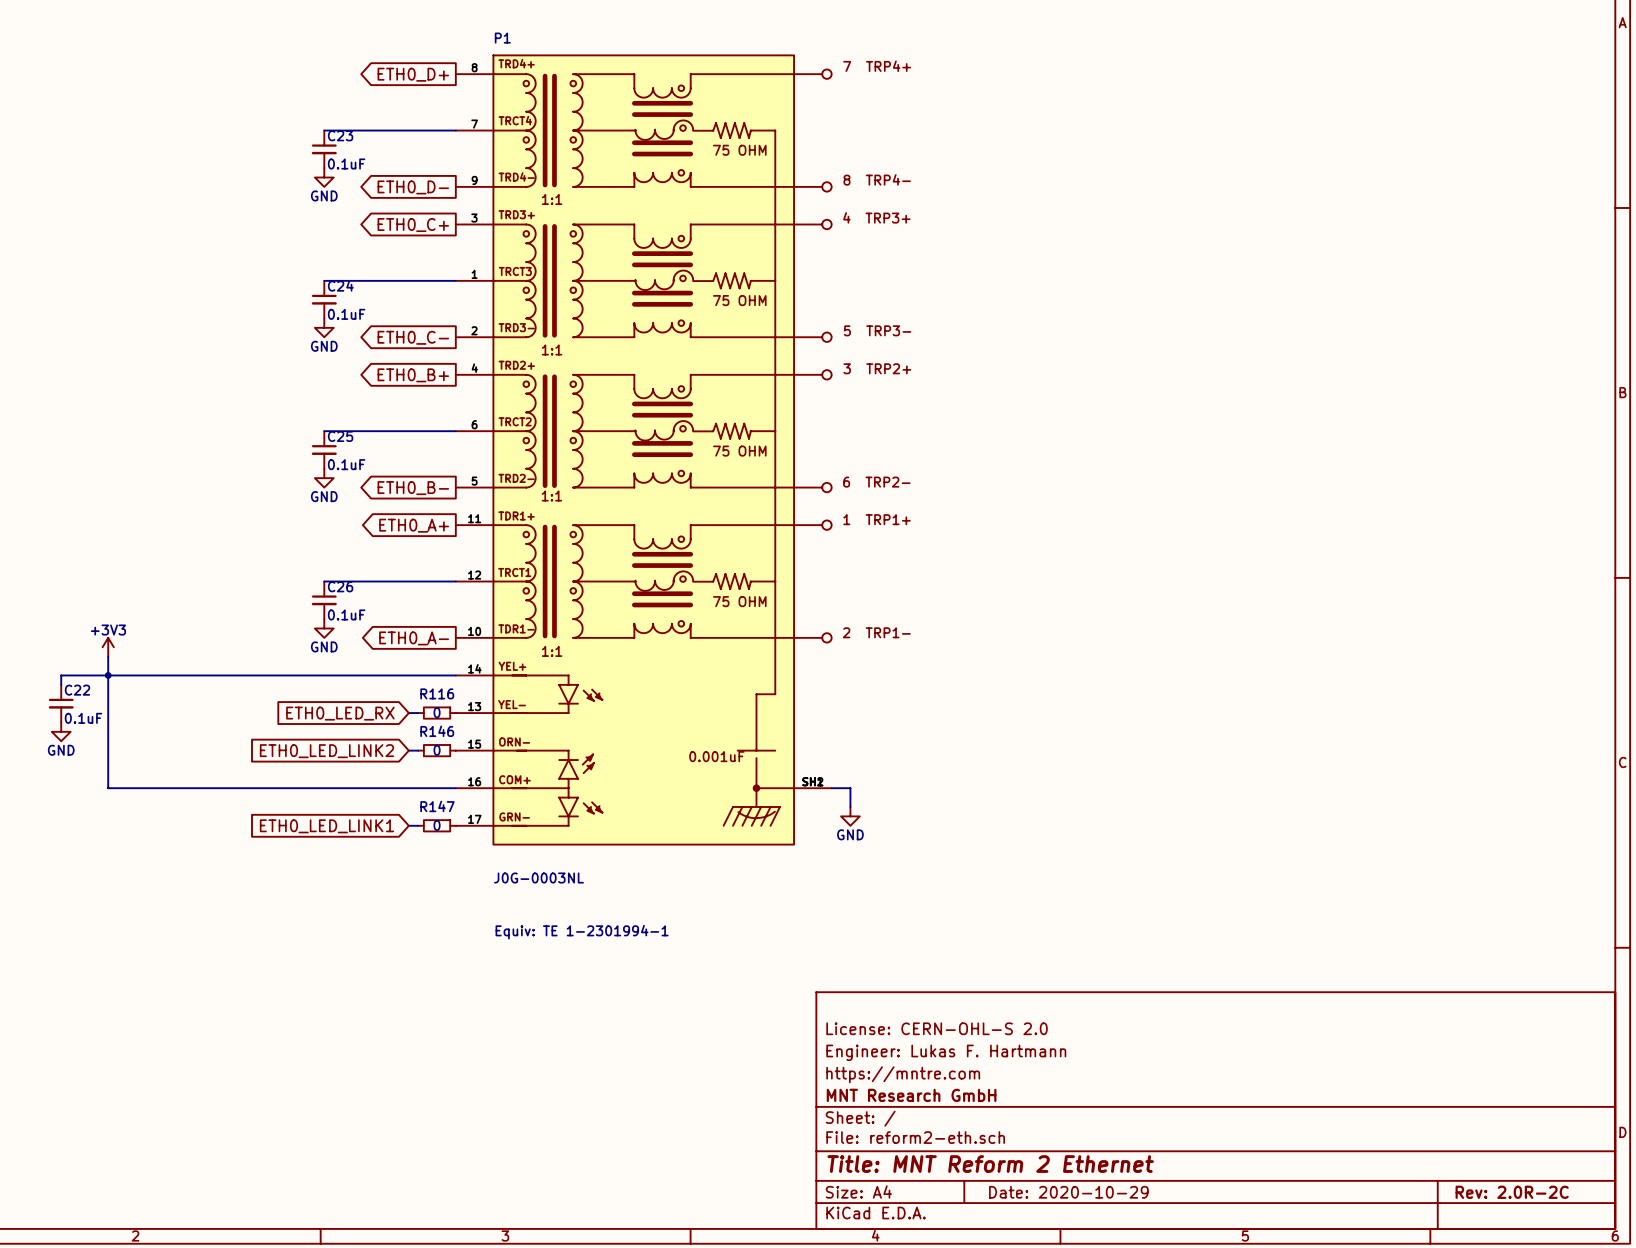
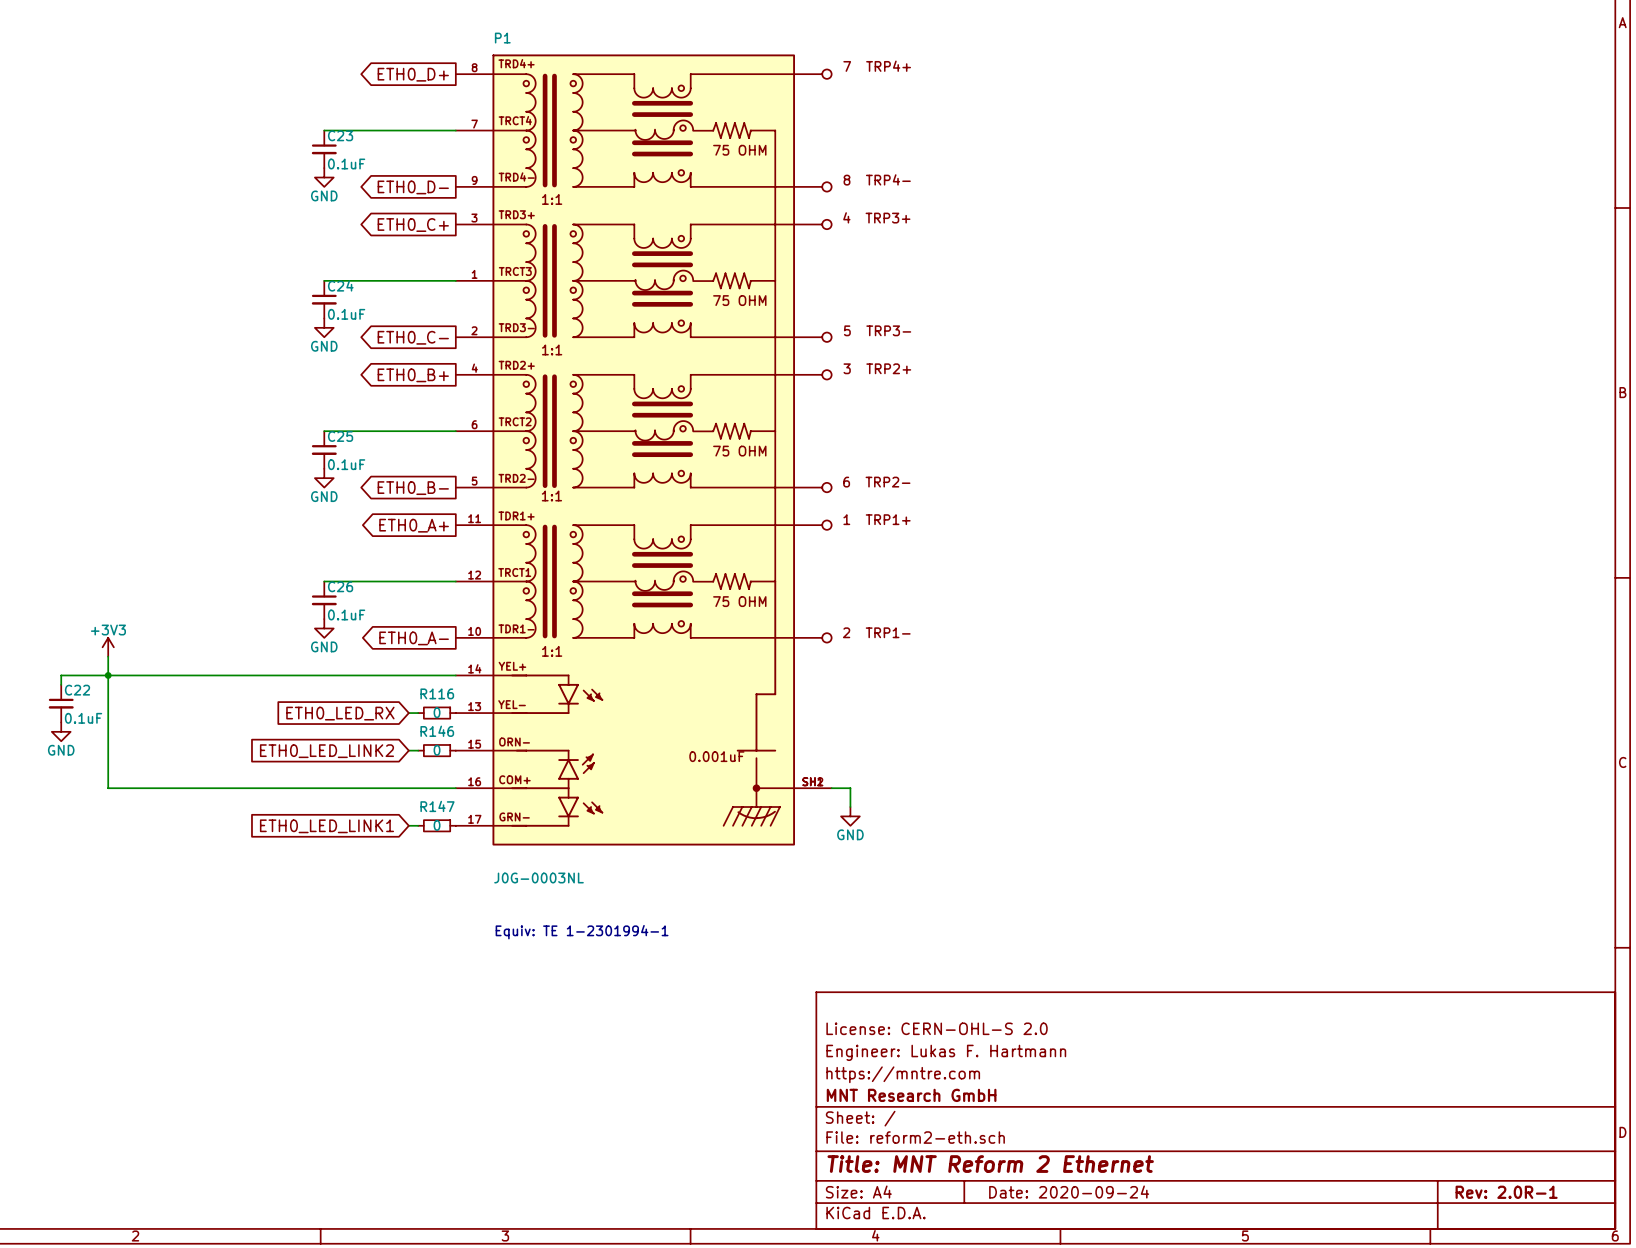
title block: Date: 2020-10-29 (1068, 1192) -> Date: 2020-09-24 (1069, 1192)
title block: Rev: 2.0R-2C (1512, 1192) -> Rev: 2.0R-1 (1506, 1192)

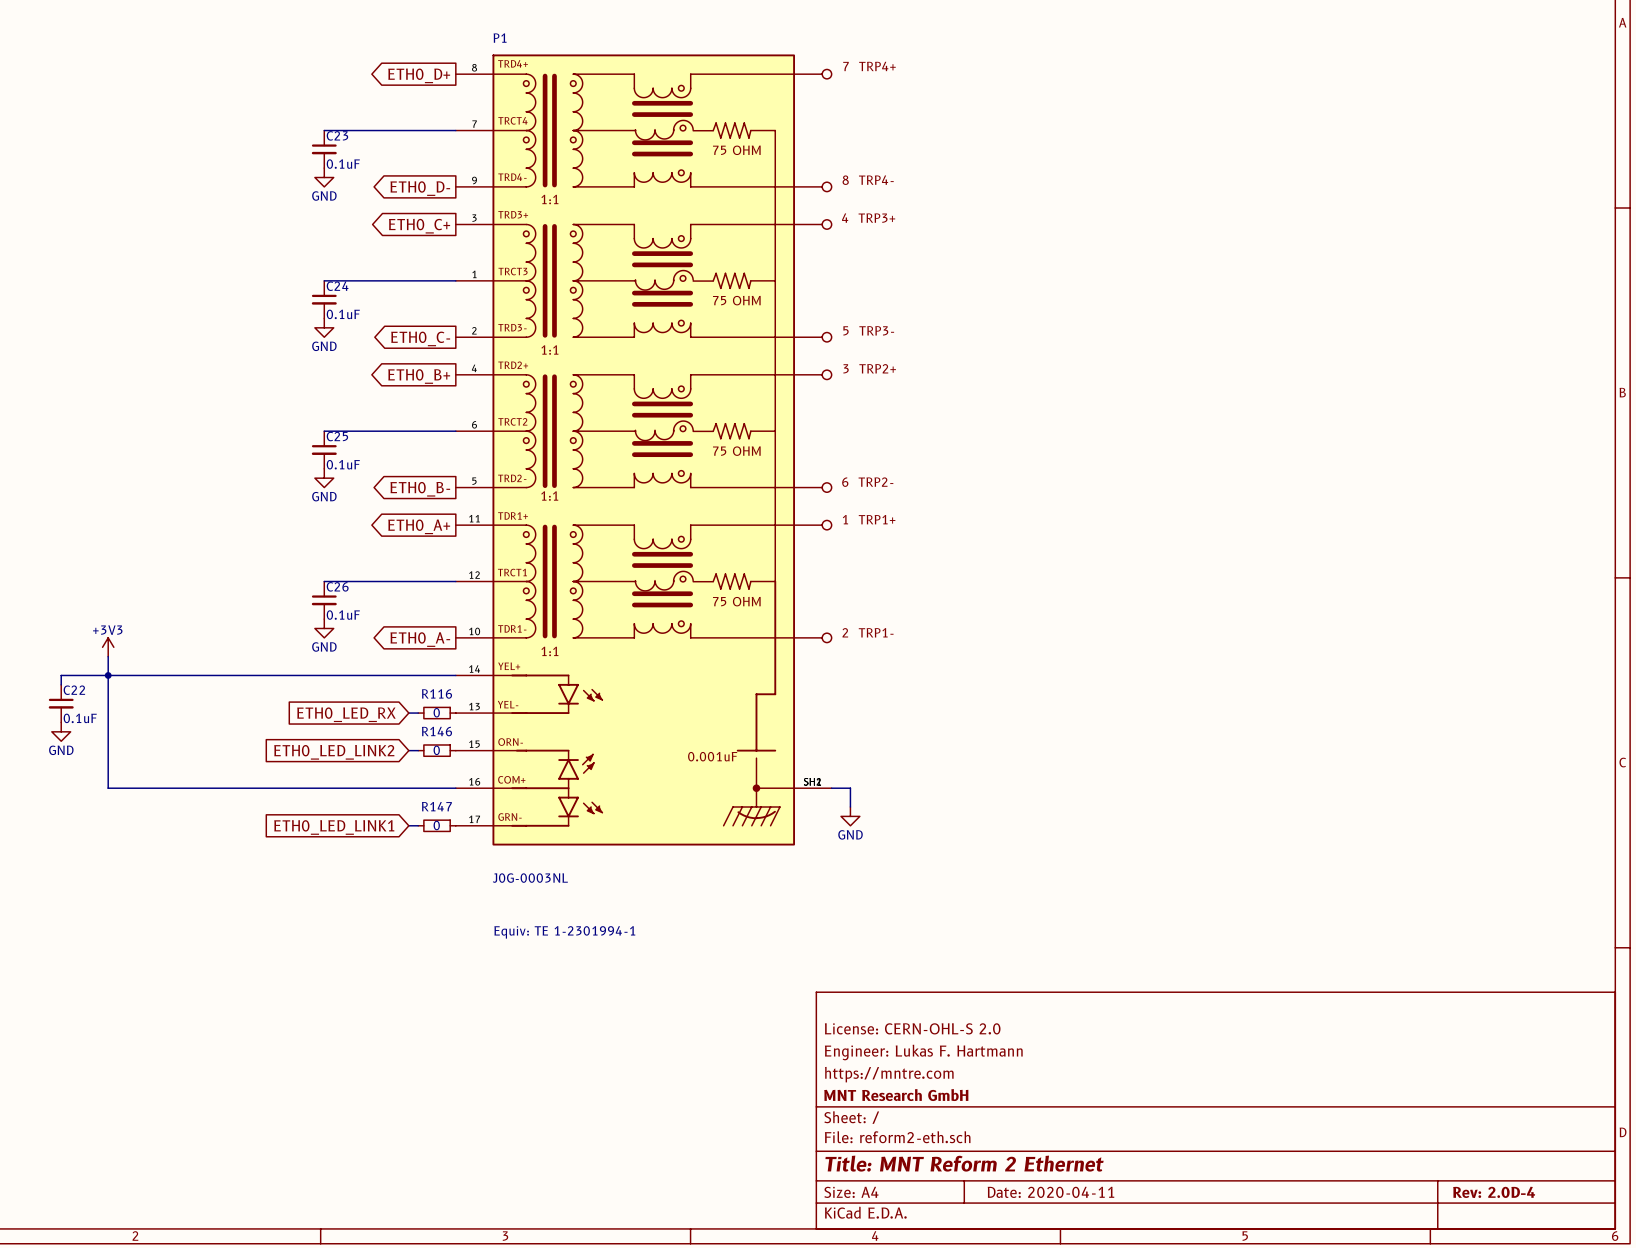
title block: Date: 2020-09-24 (1069, 1192) -> Date: 2020-04-11 (1050, 1192)
title block: Rev: 2.0R-1 (1506, 1192) -> Rev: 2.0D-4 (1494, 1192)

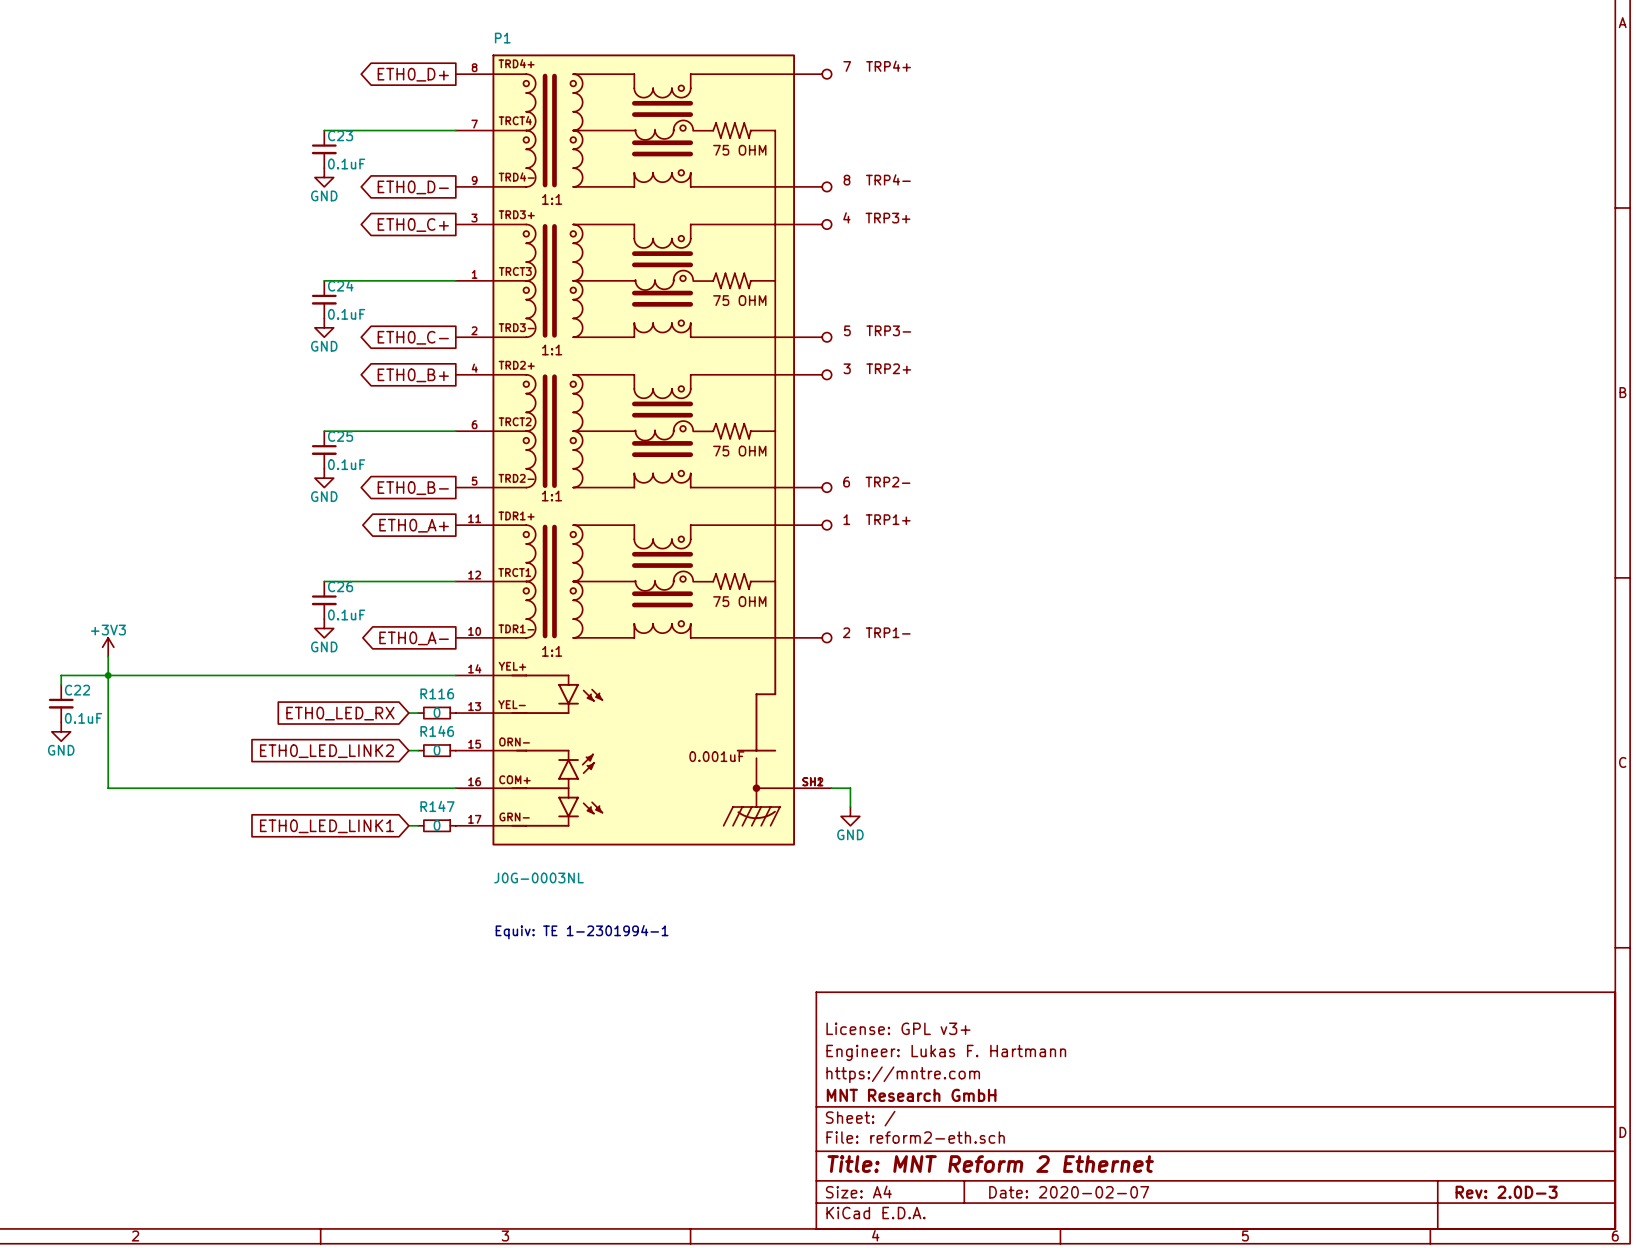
title block: License: CERN-OHL-S 2.0 (912, 1028) -> License: GPL v3+ (898, 1028)
title block: Date: 2020-04-11 (1050, 1192) -> Date: 2020-02-07 (1069, 1192)
title block: Rev: 2.0D-4 (1494, 1192) -> Rev: 2.0D-3 (1506, 1192)

